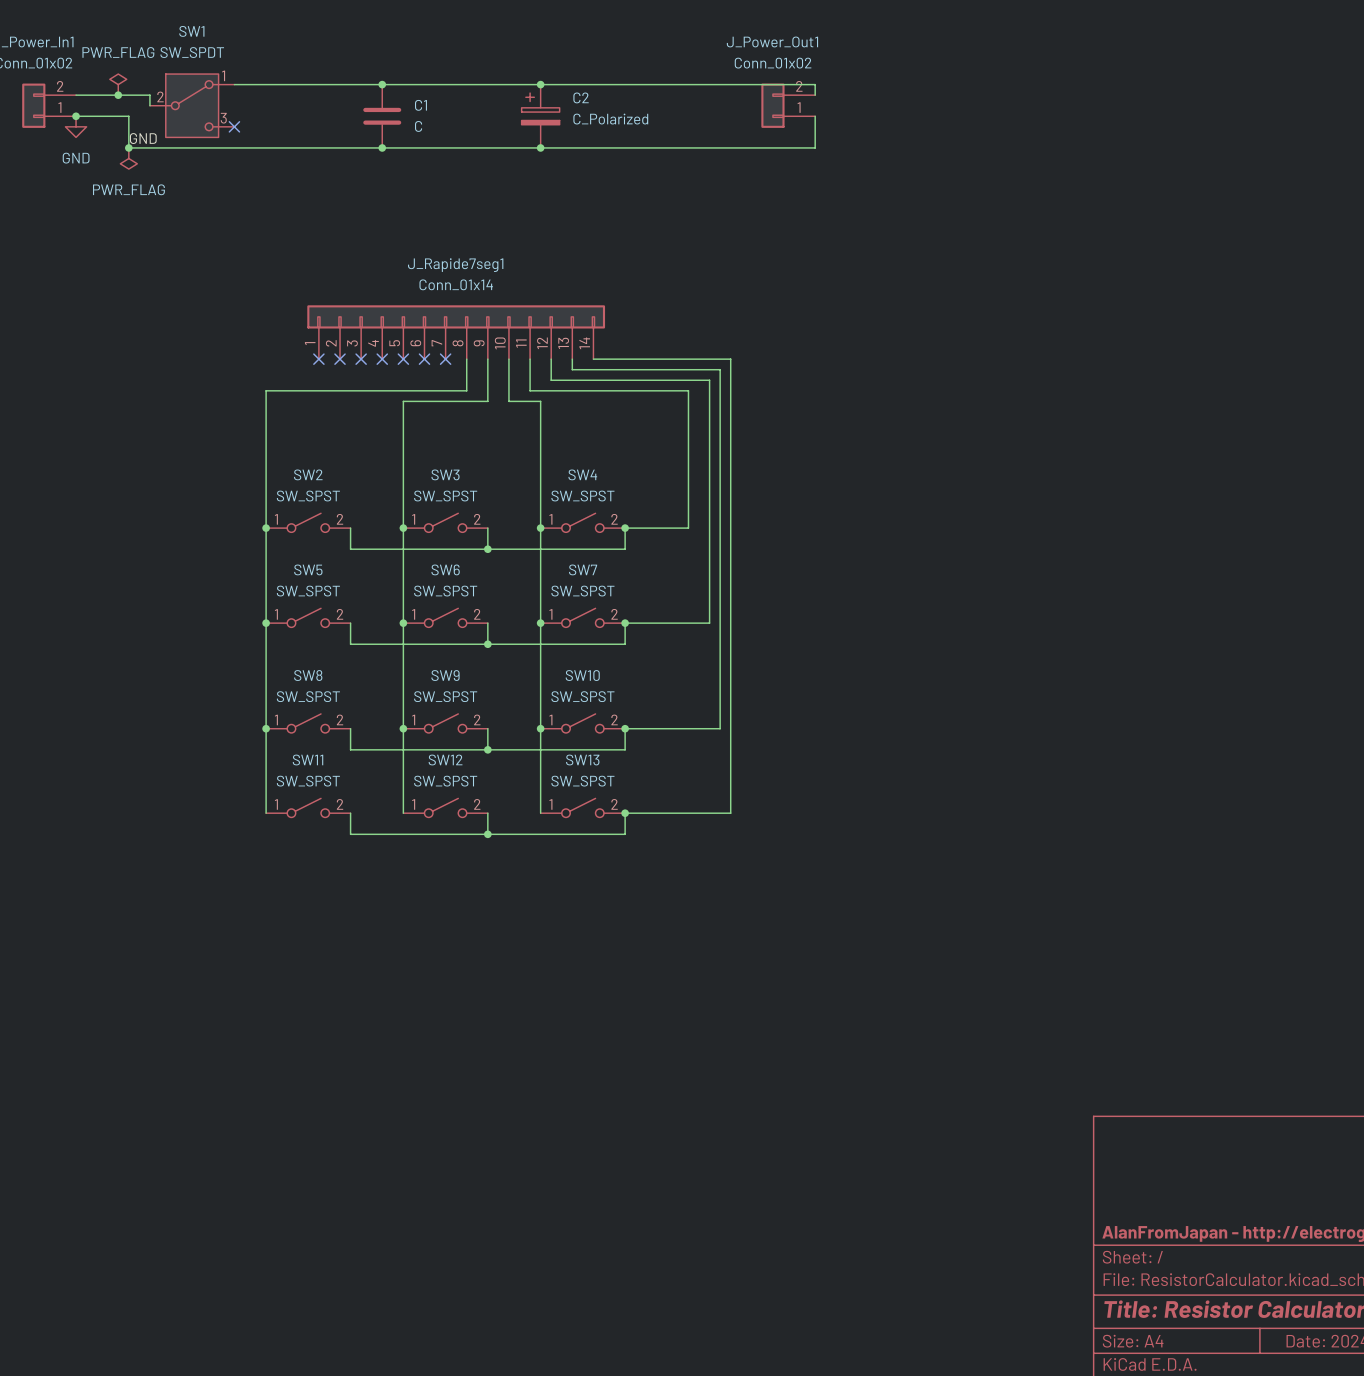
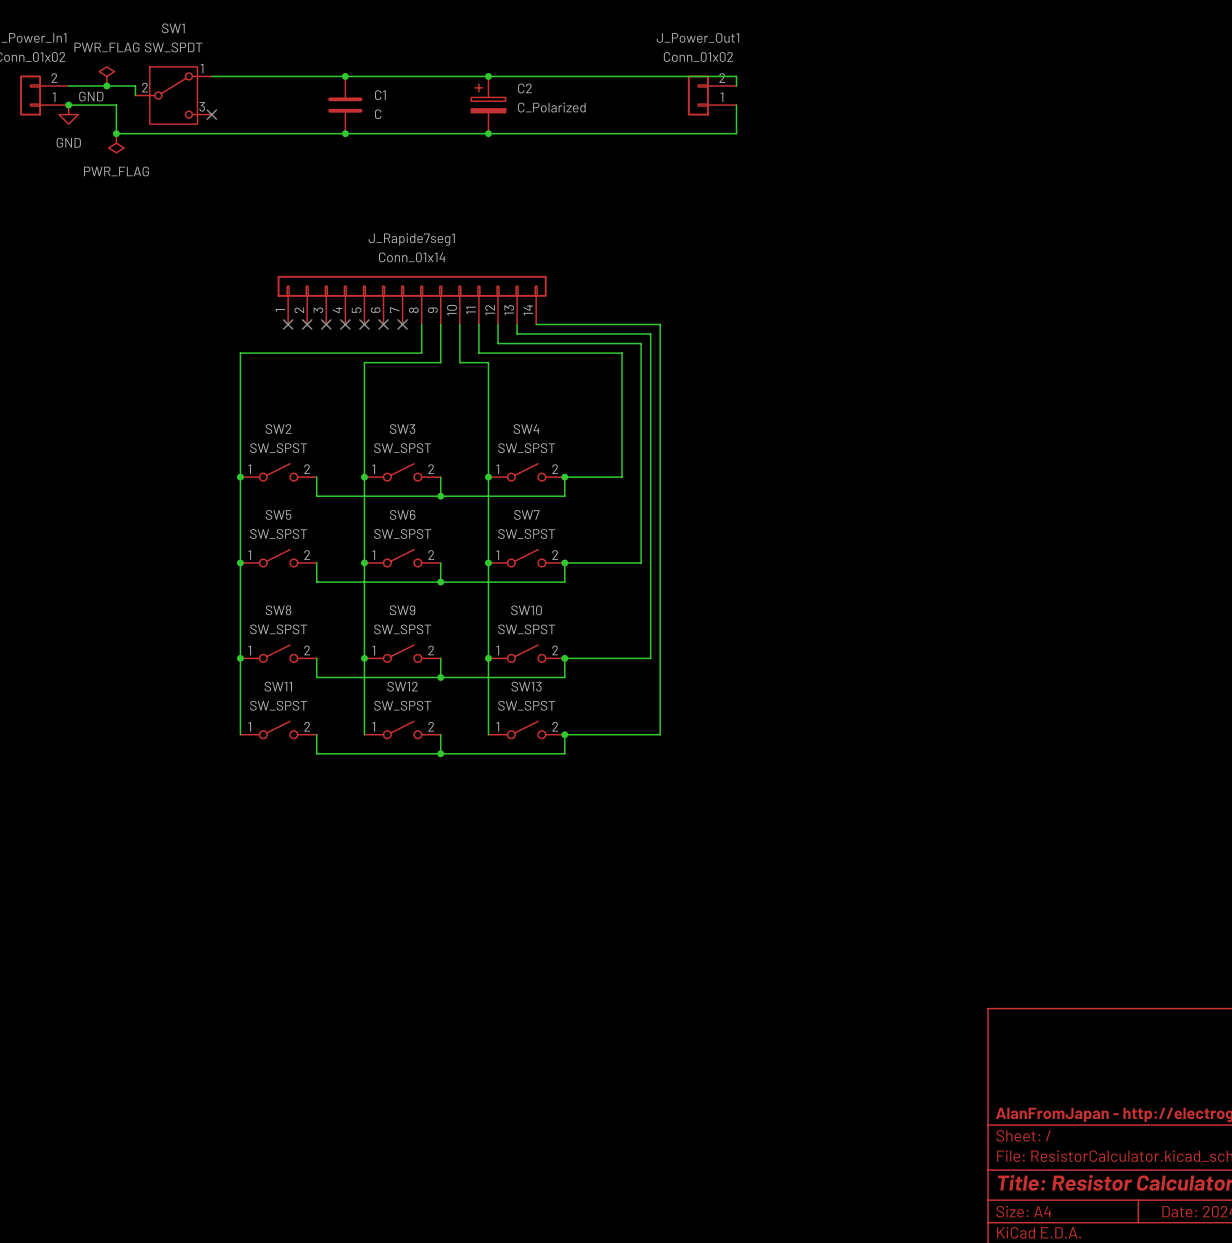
label position: GND (143, 138) -> GND (91, 96)

